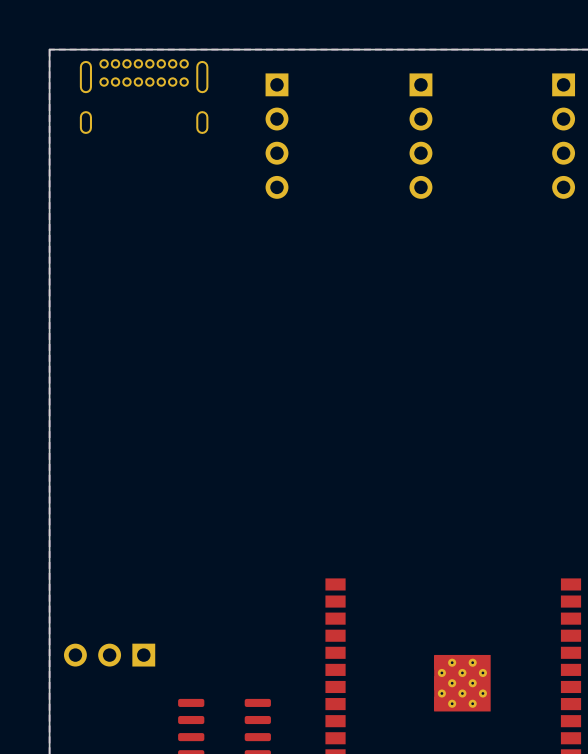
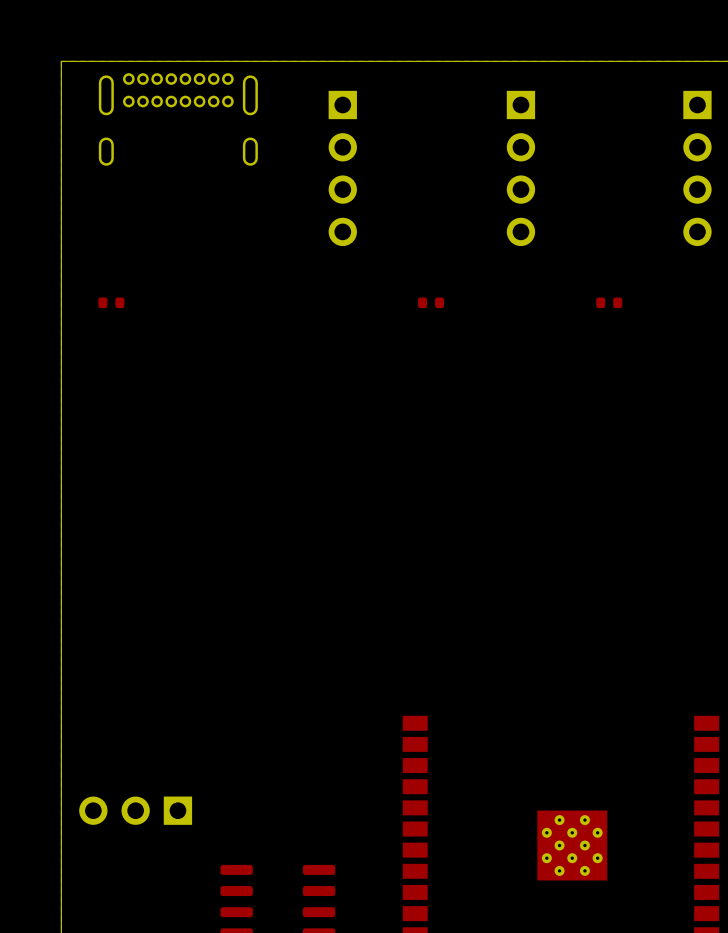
part: none -> (111, 302)
part: none -> (431, 302)
part: none -> (609, 302)

